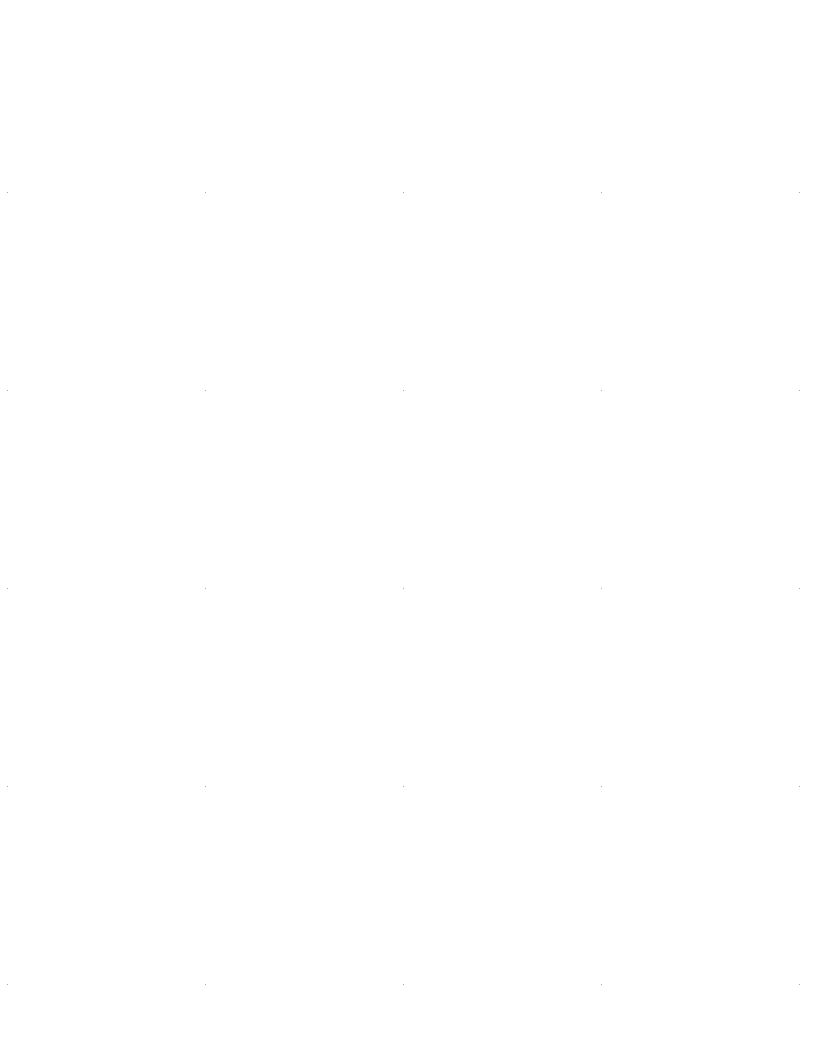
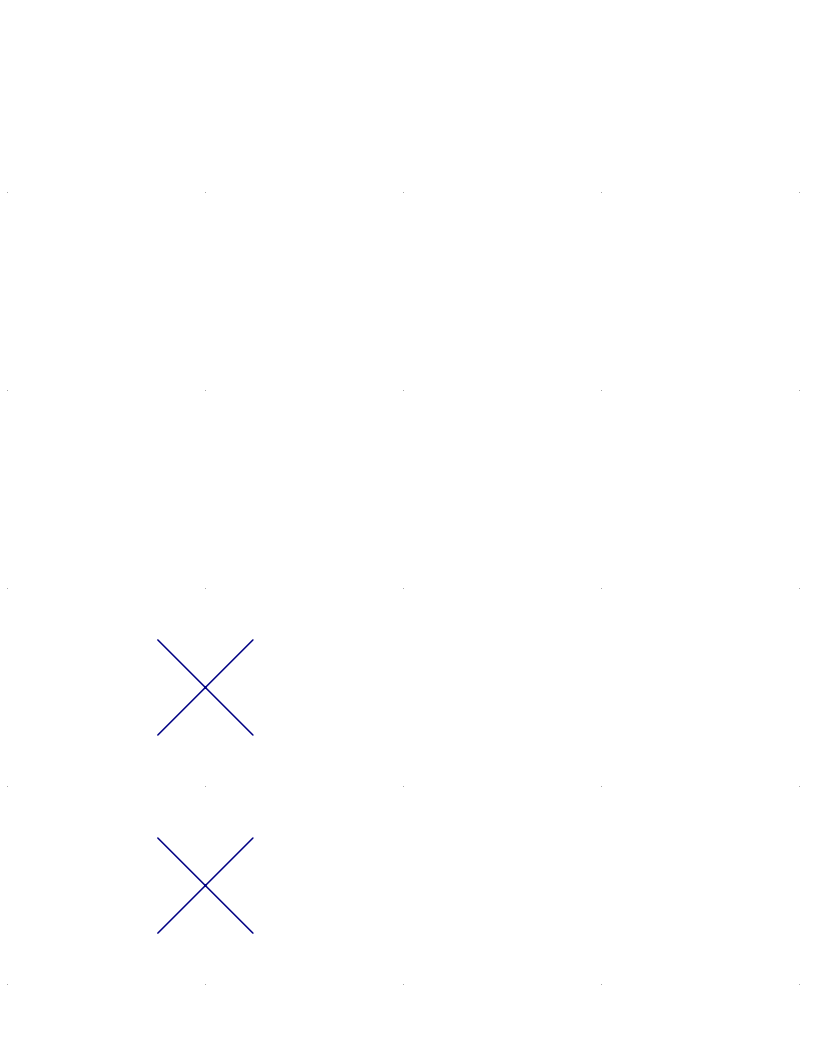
no-connect mark: none -> (205, 687)
no-connect mark: none -> (205, 885)

